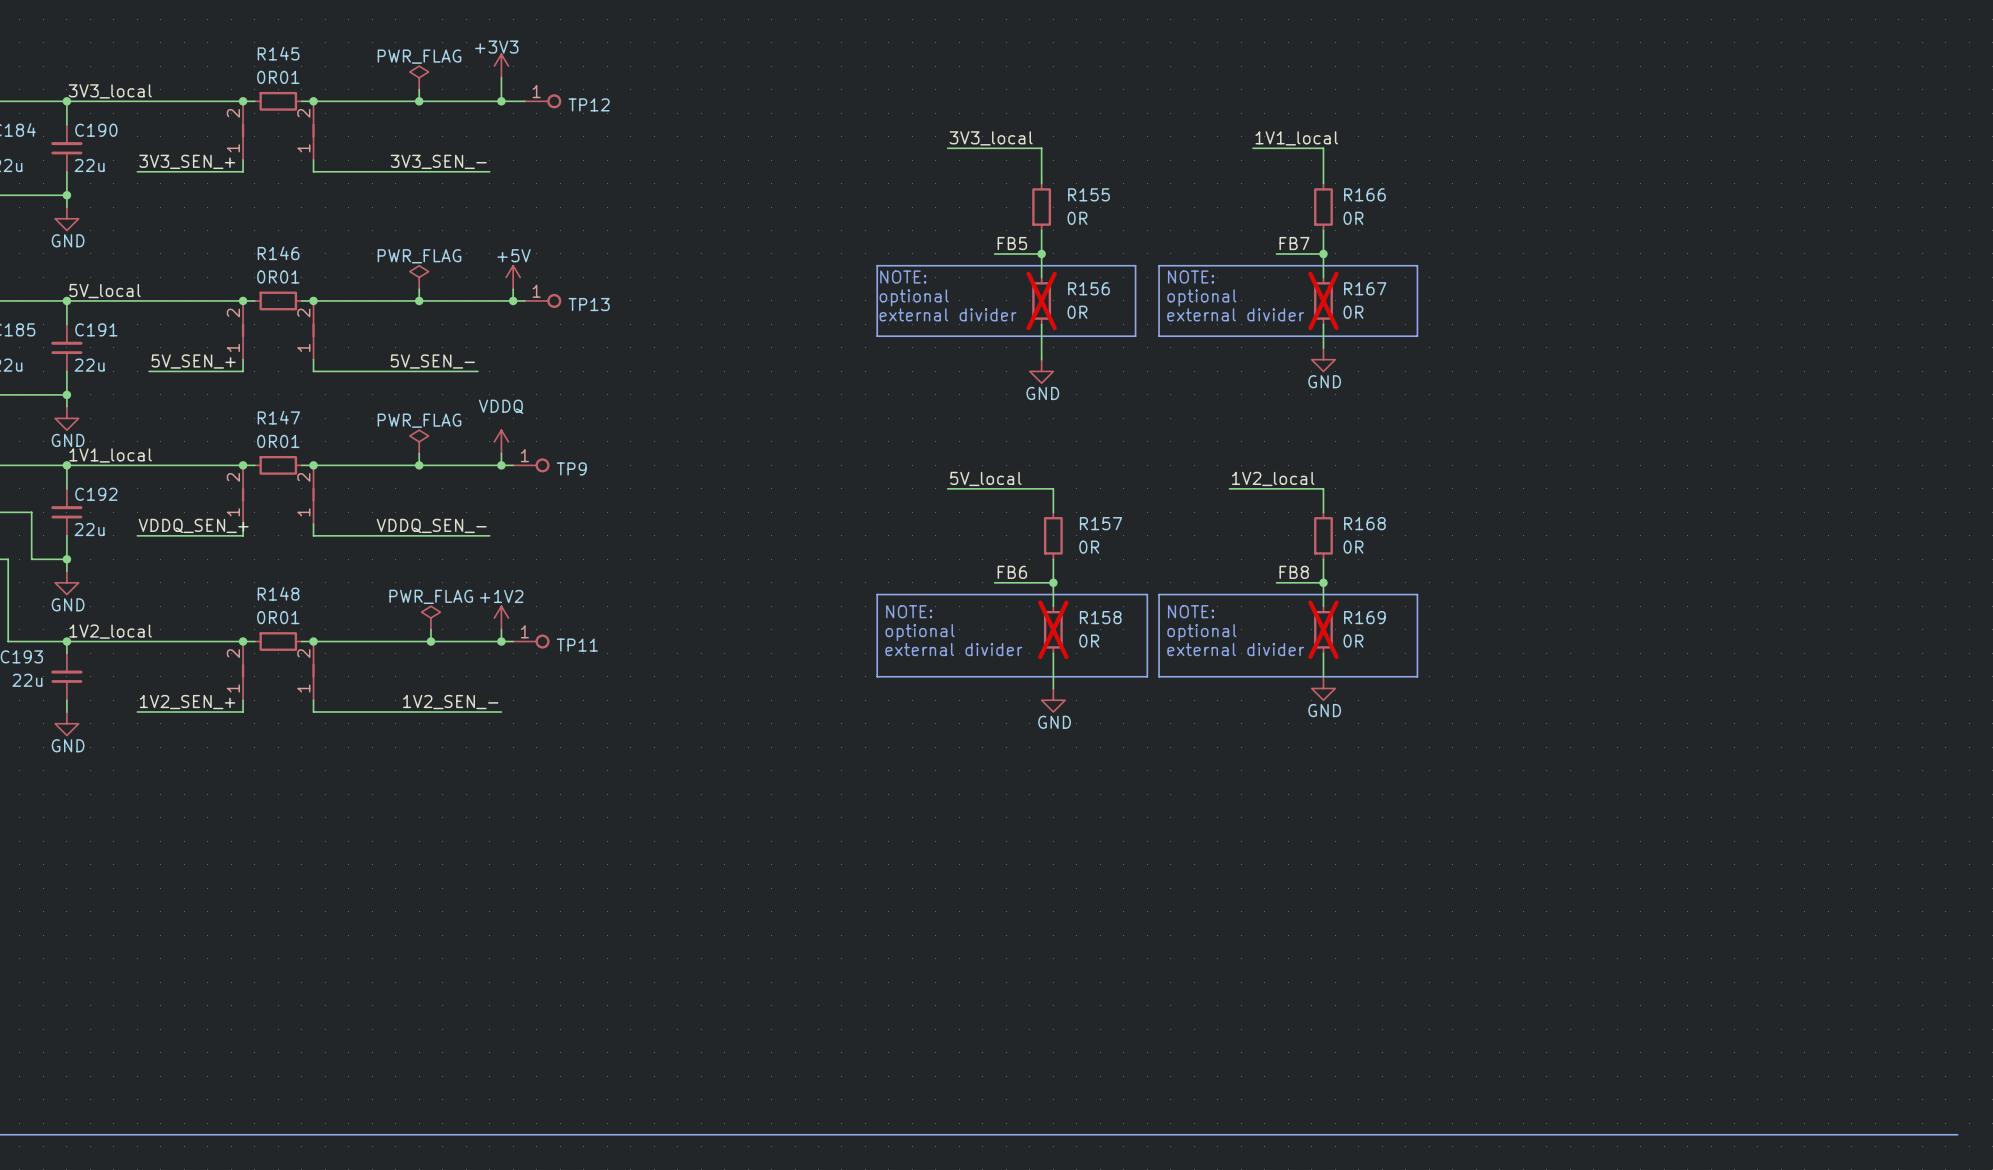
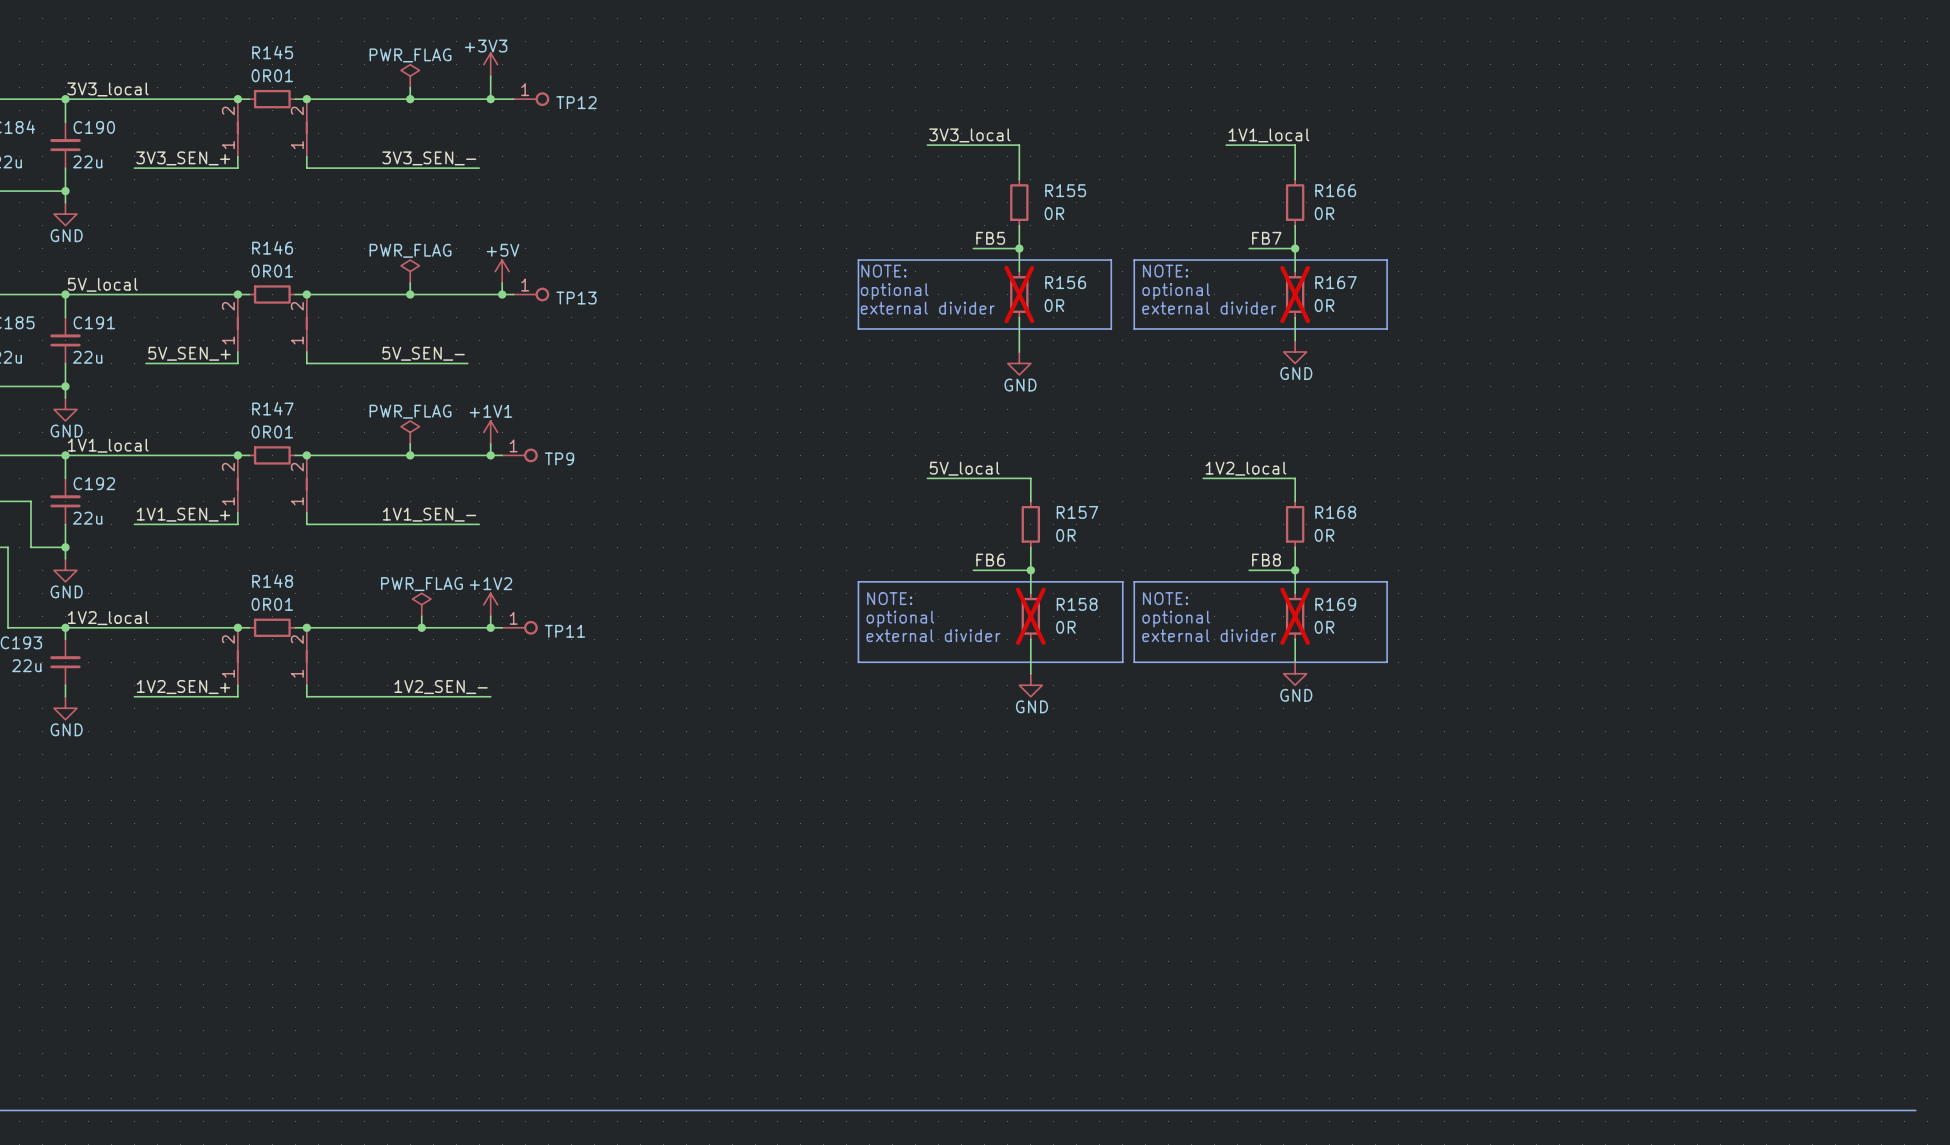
power symbol: VDDQ (501, 441) -> +1V1 (490, 432)
label: VDDQ_SEN_+ (193, 525) -> 1V1_SEN_+ (183, 514)
label: VDDQ_SEN_- (431, 525) -> 1V1_SEN_- (429, 514)

